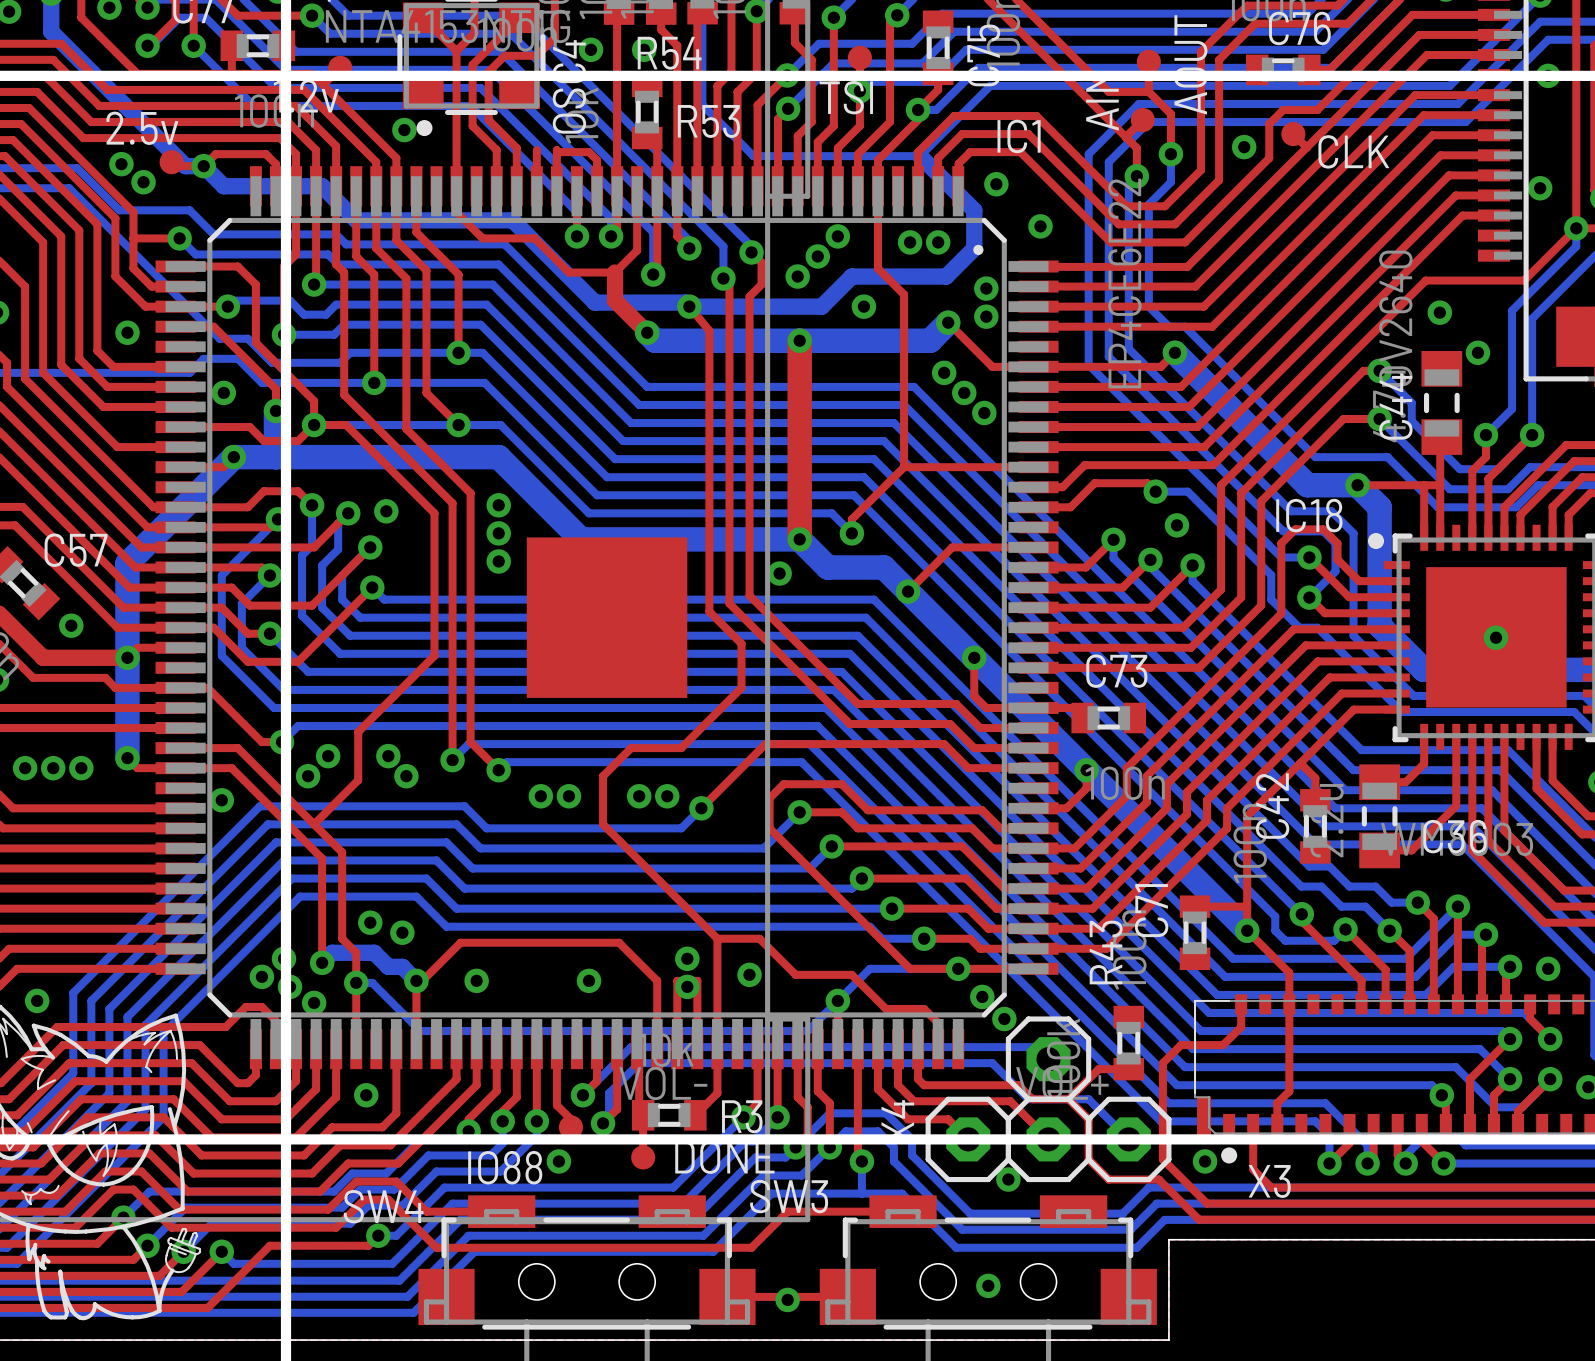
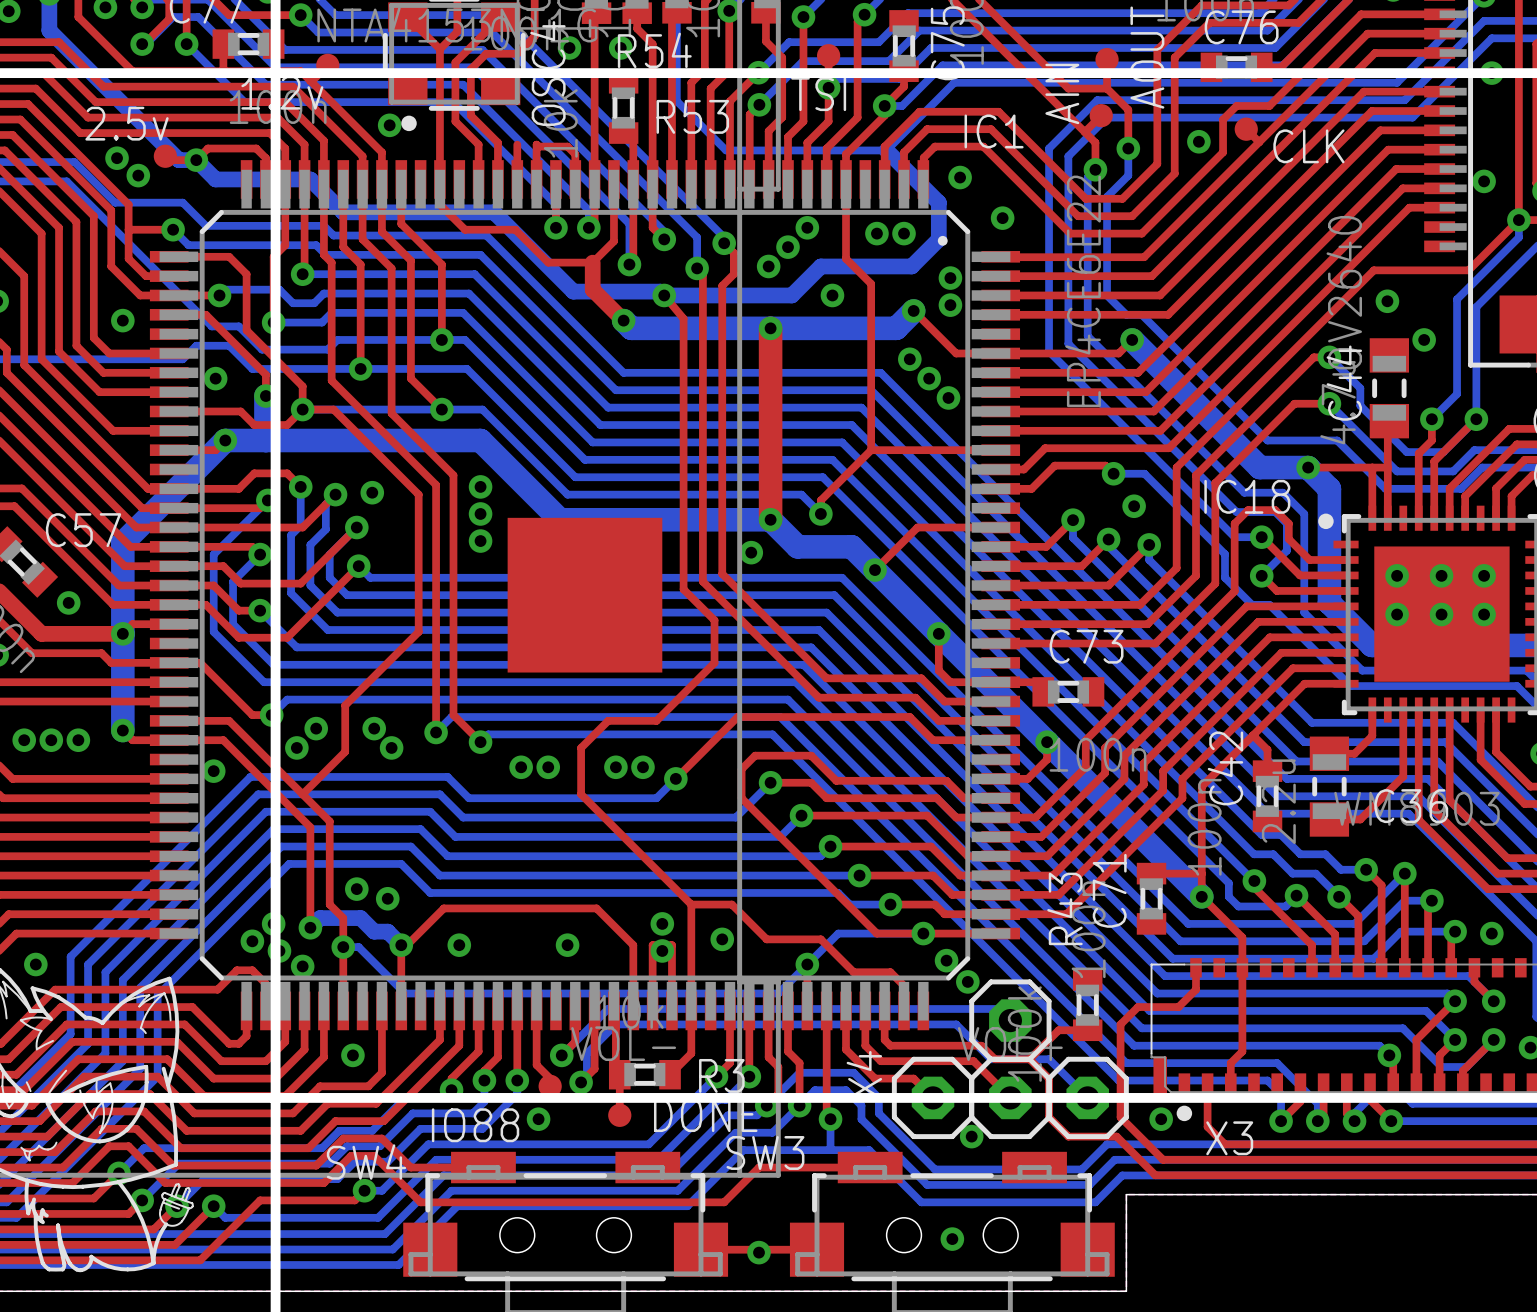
via: none -> (1397, 575)
via: none -> (1441, 575)
via: none -> (1484, 575)
via: none -> (1397, 614)
via: none -> (1484, 614)

